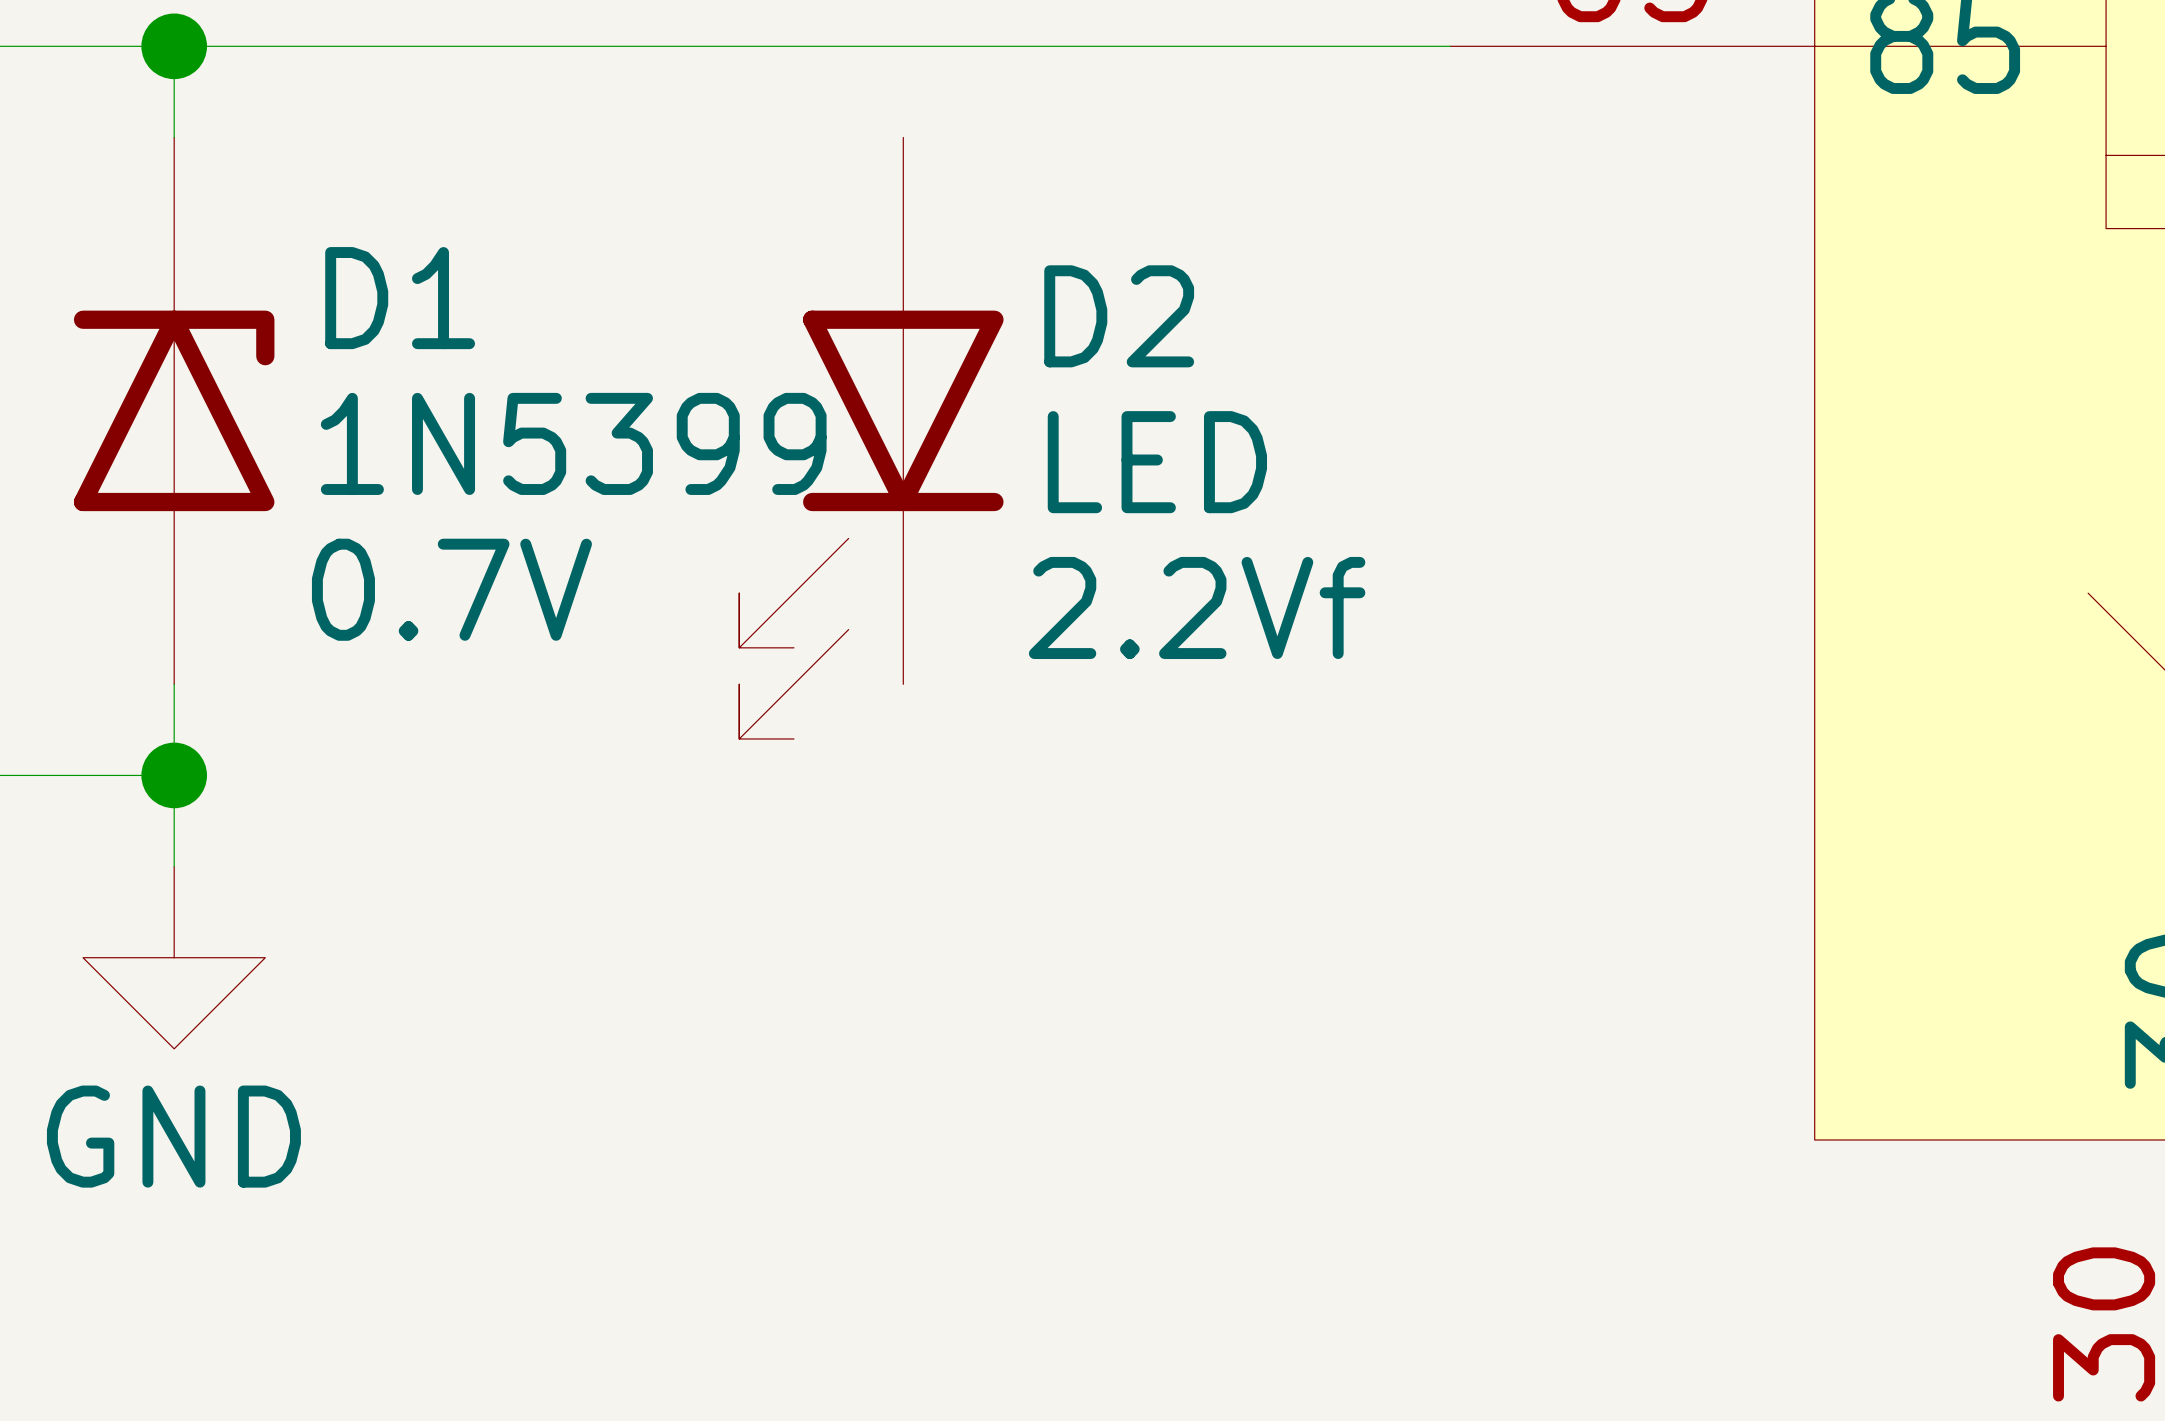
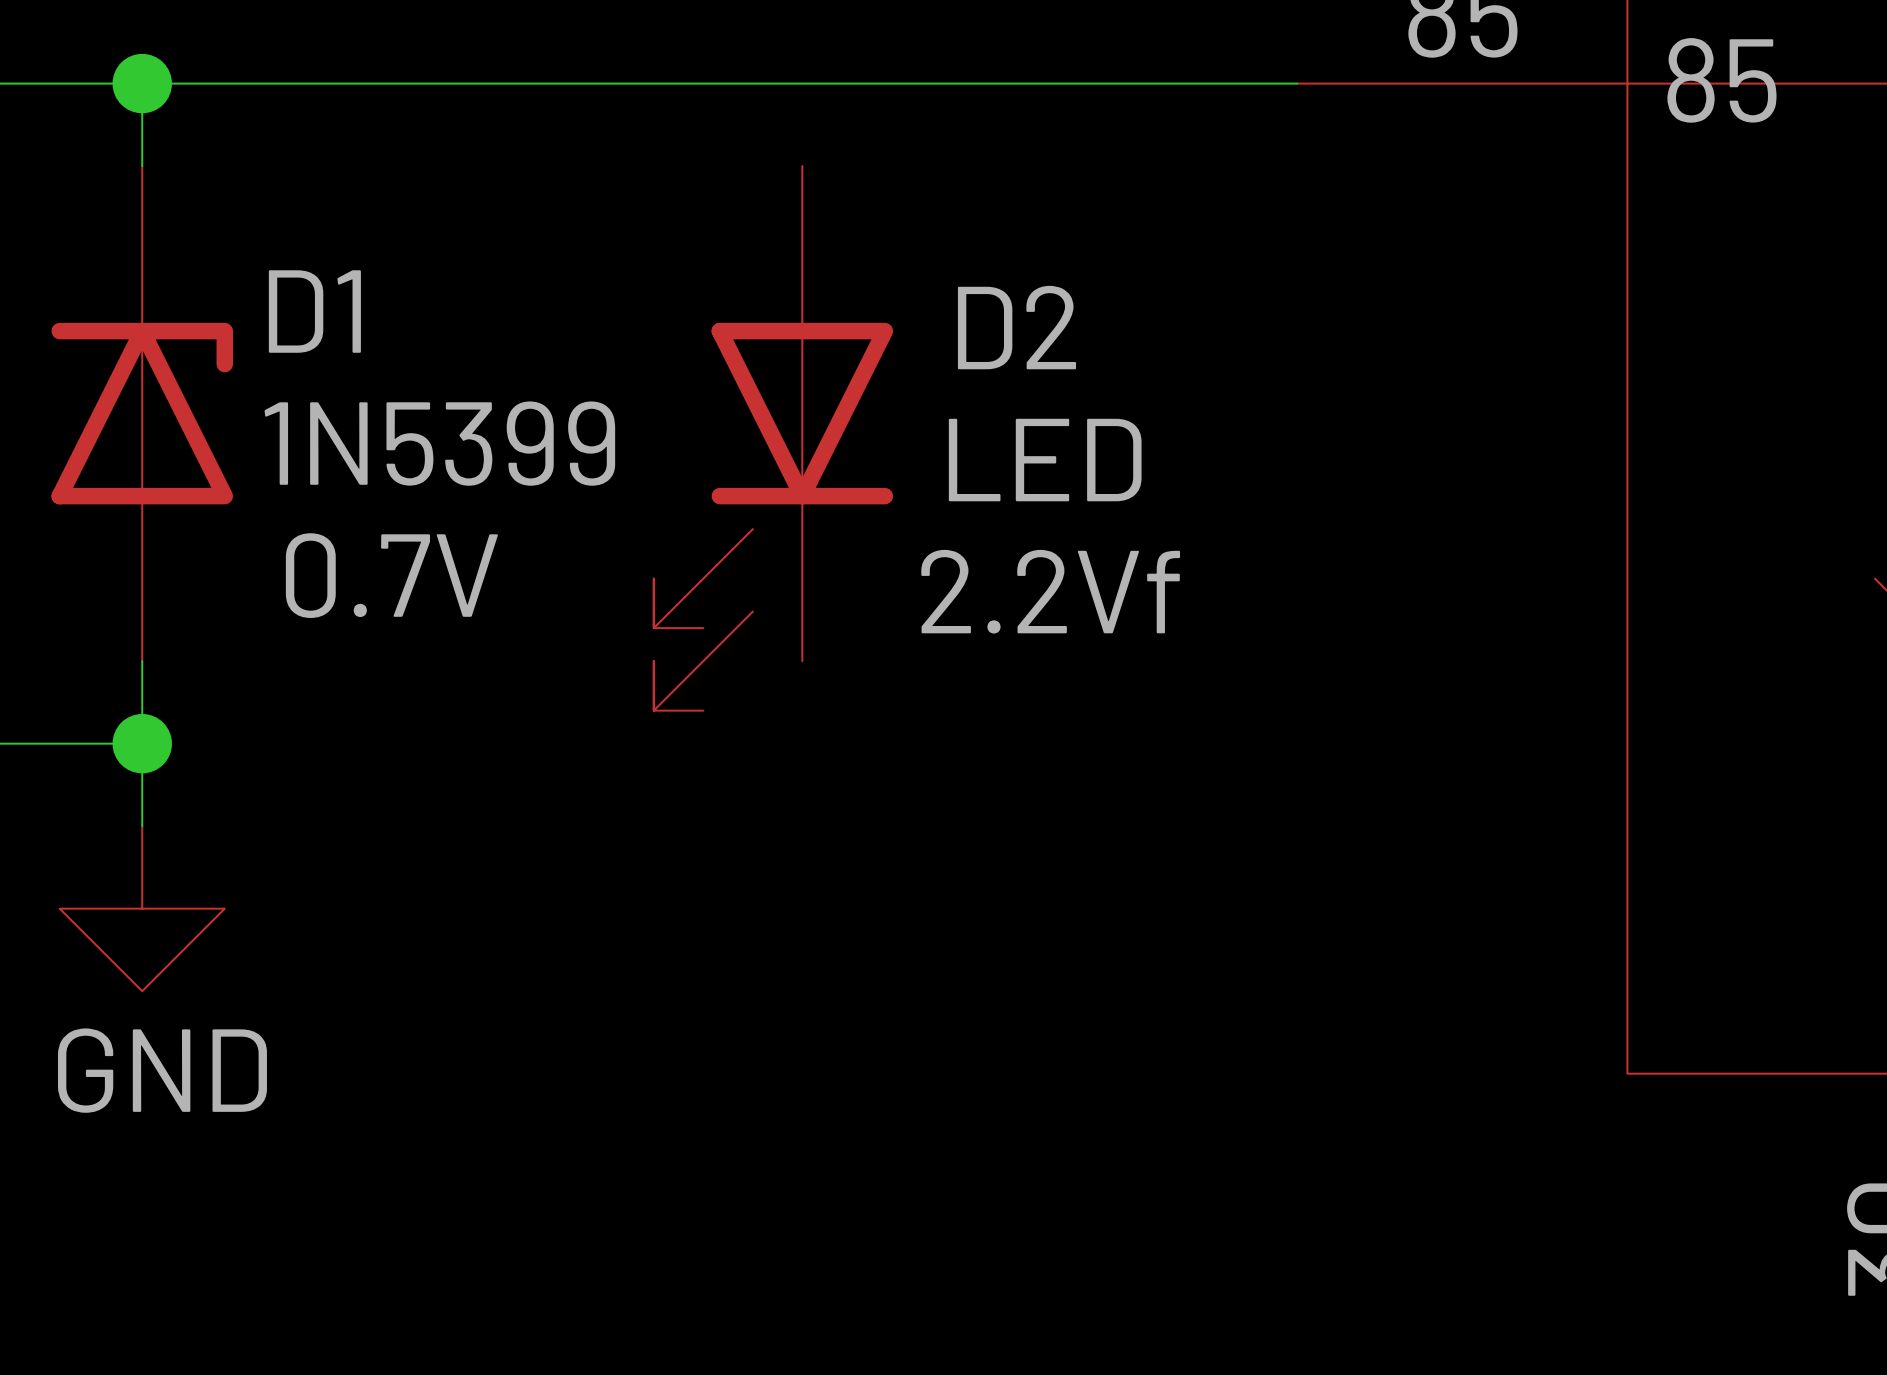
D2 text position: 2.2Vf (1197, 607) -> 2.2Vf (1050, 591)

